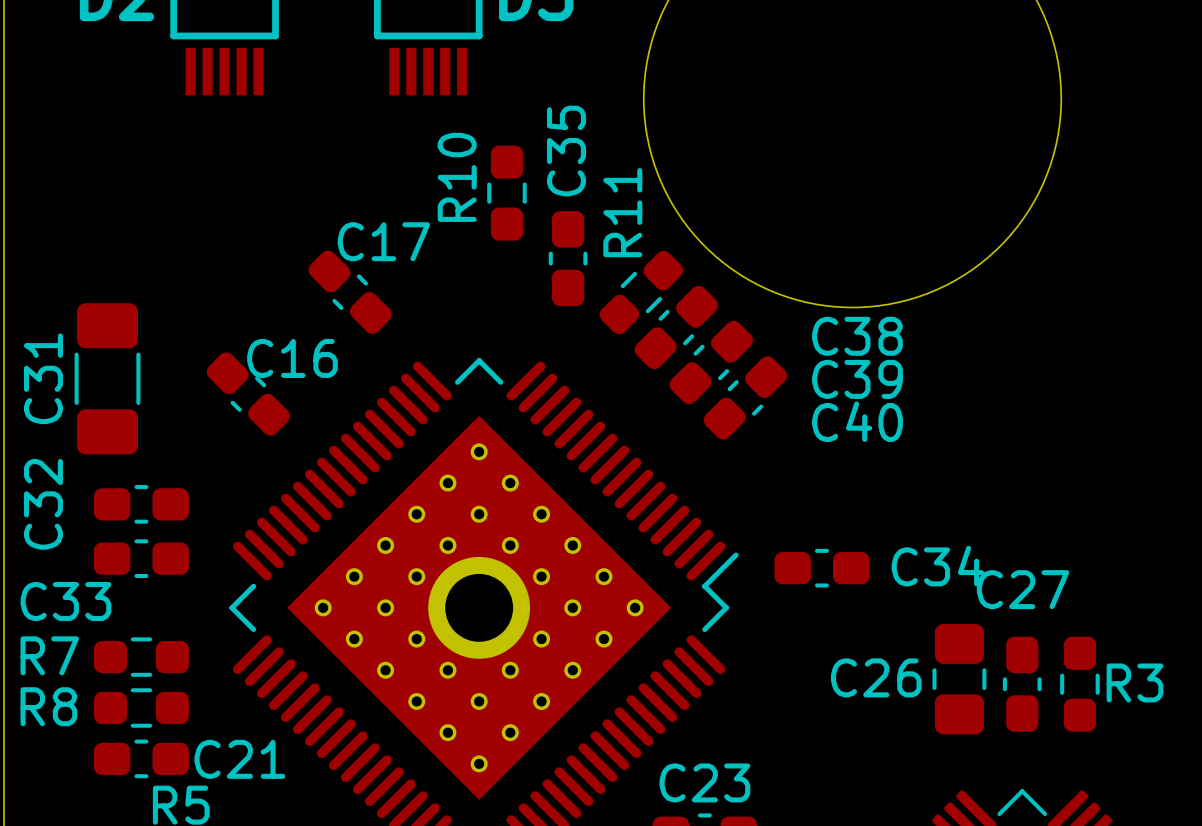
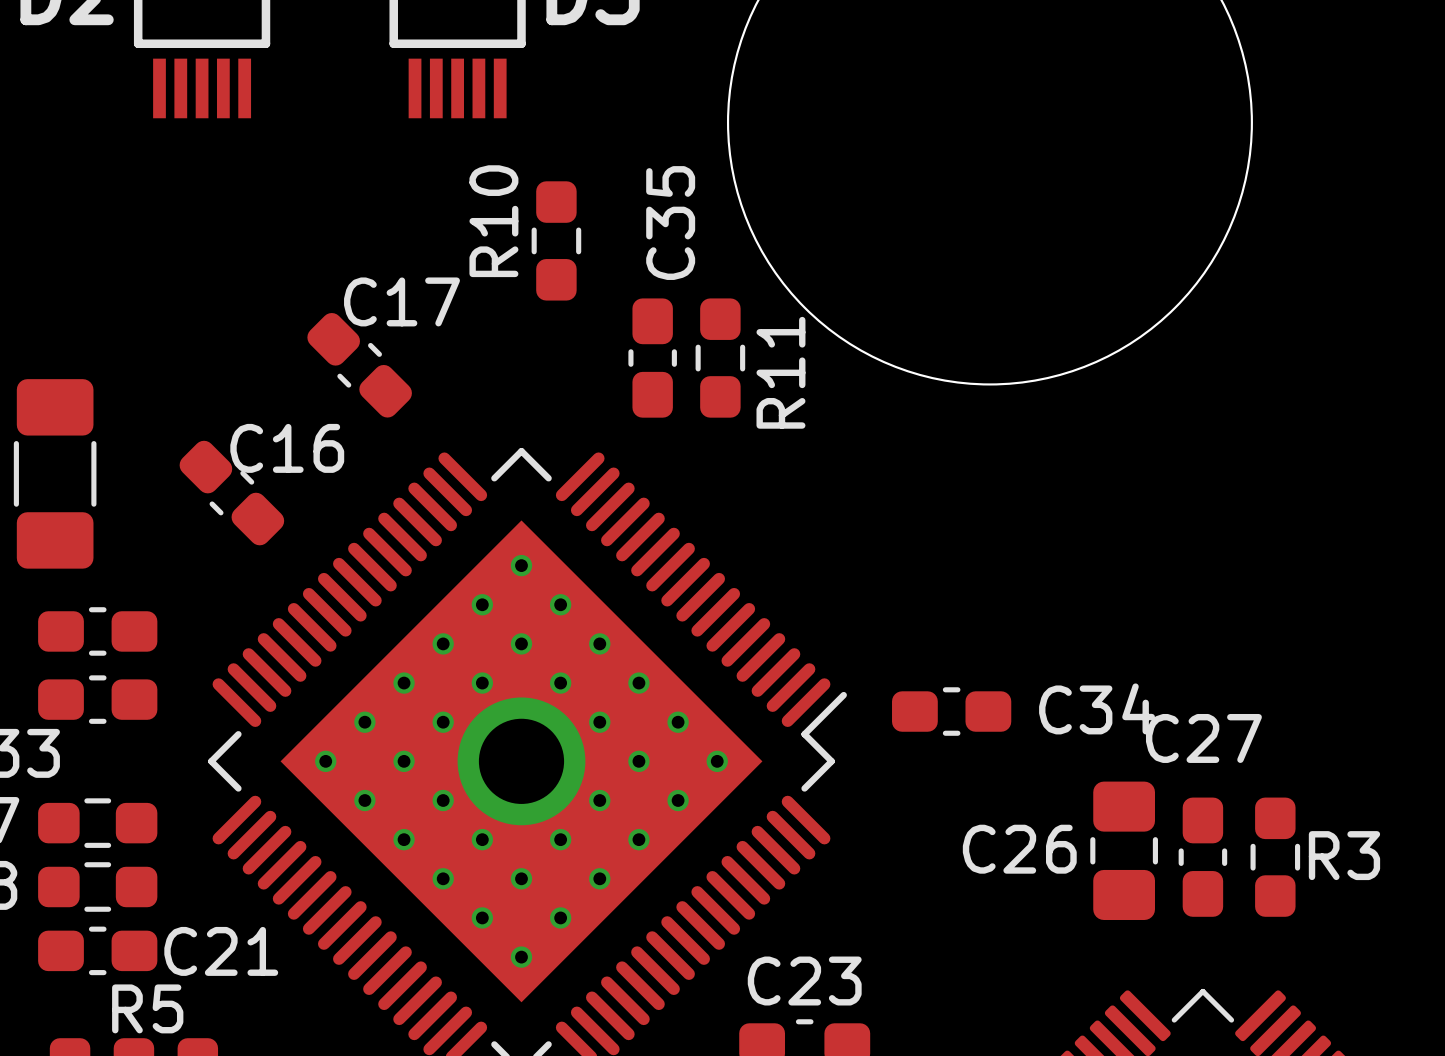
C35 name position: C35 (566, 151) -> C35 (670, 223)
R11 name position: R11 (622, 212) -> R11 (780, 372)
C35 position: (568, 258) -> (652, 358)
R11 rotation: 0° (641, 292) -> 45° counterclockwise (720, 358)
C38: (676, 327) -> none
C39: (711, 362) -> none
C40: (745, 397) -> none

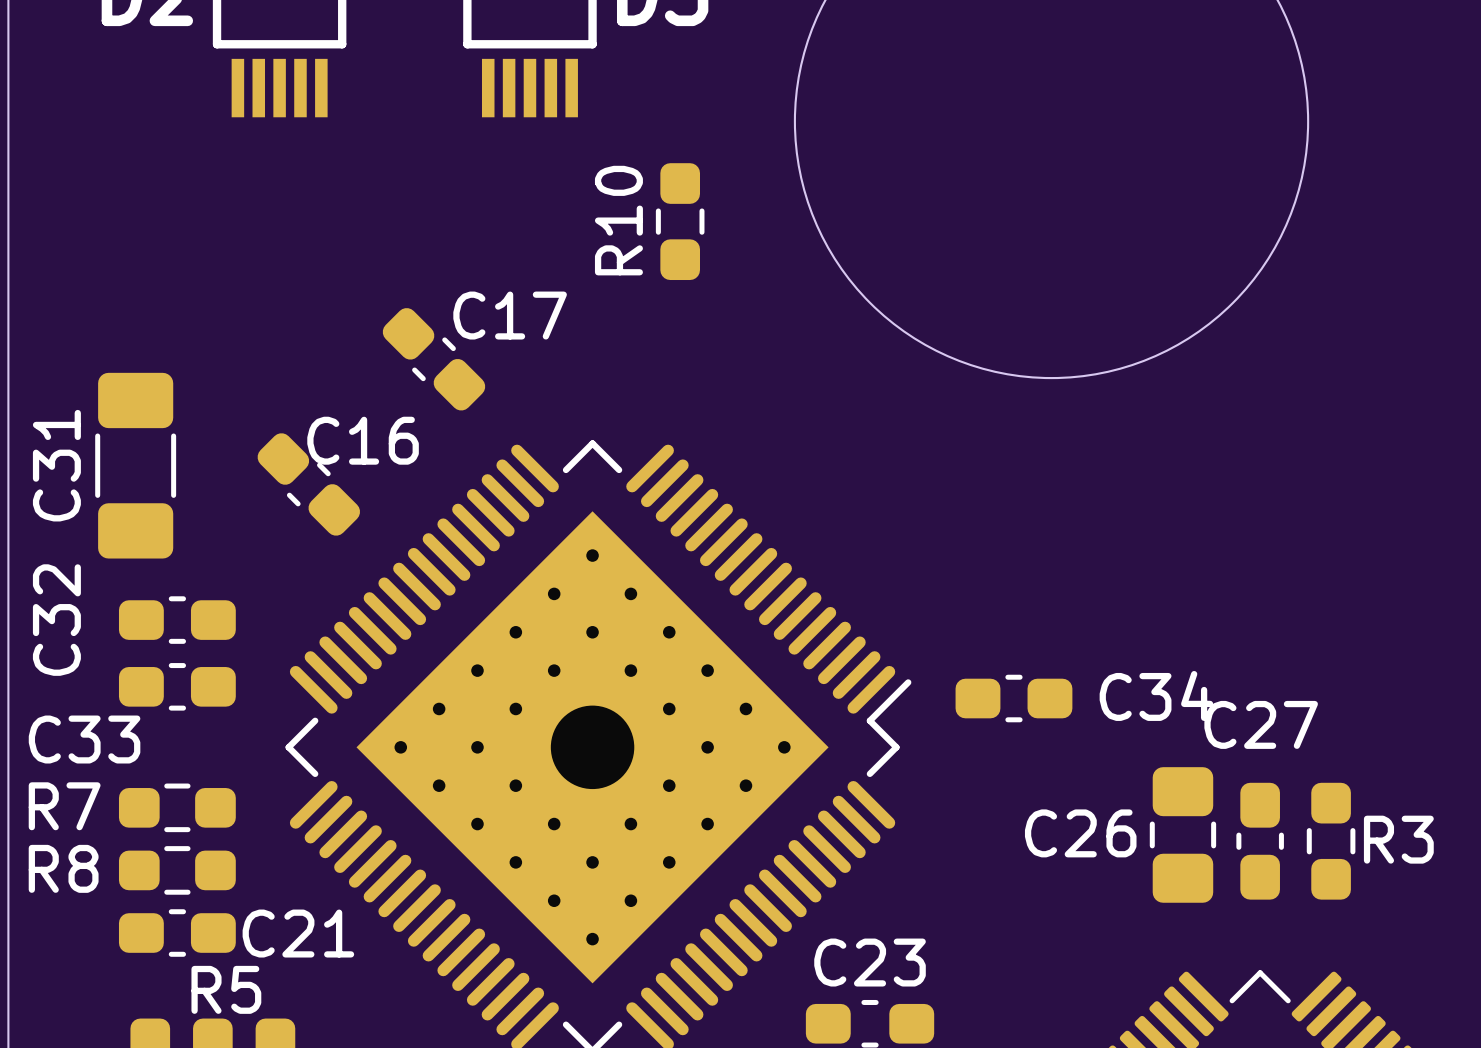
R10 name position: R10 (493, 221) -> R10 (618, 220)
R10 position: (556, 240) -> (680, 221)
C17 name position: C17 (401, 301) -> C17 (510, 315)
C35: (652, 358) -> none
R11: (720, 358) -> none

